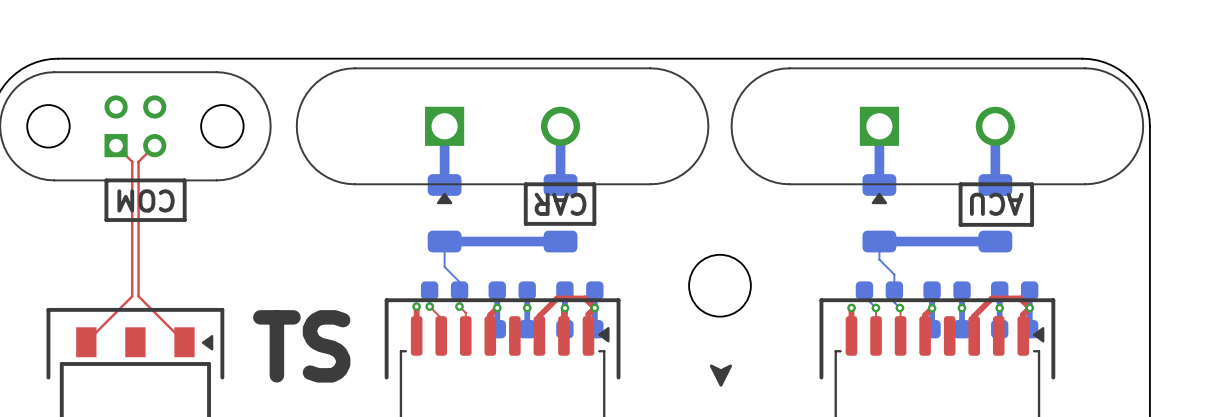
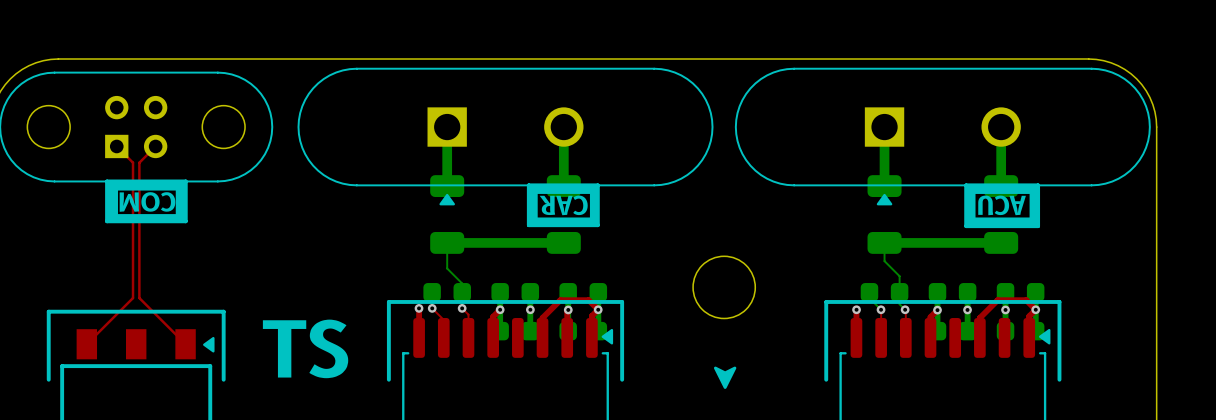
drawing: none -> [107, 182, 186, 222]
drawing: none -> [529, 186, 598, 226]
drawing: none -> [967, 186, 1038, 226]

